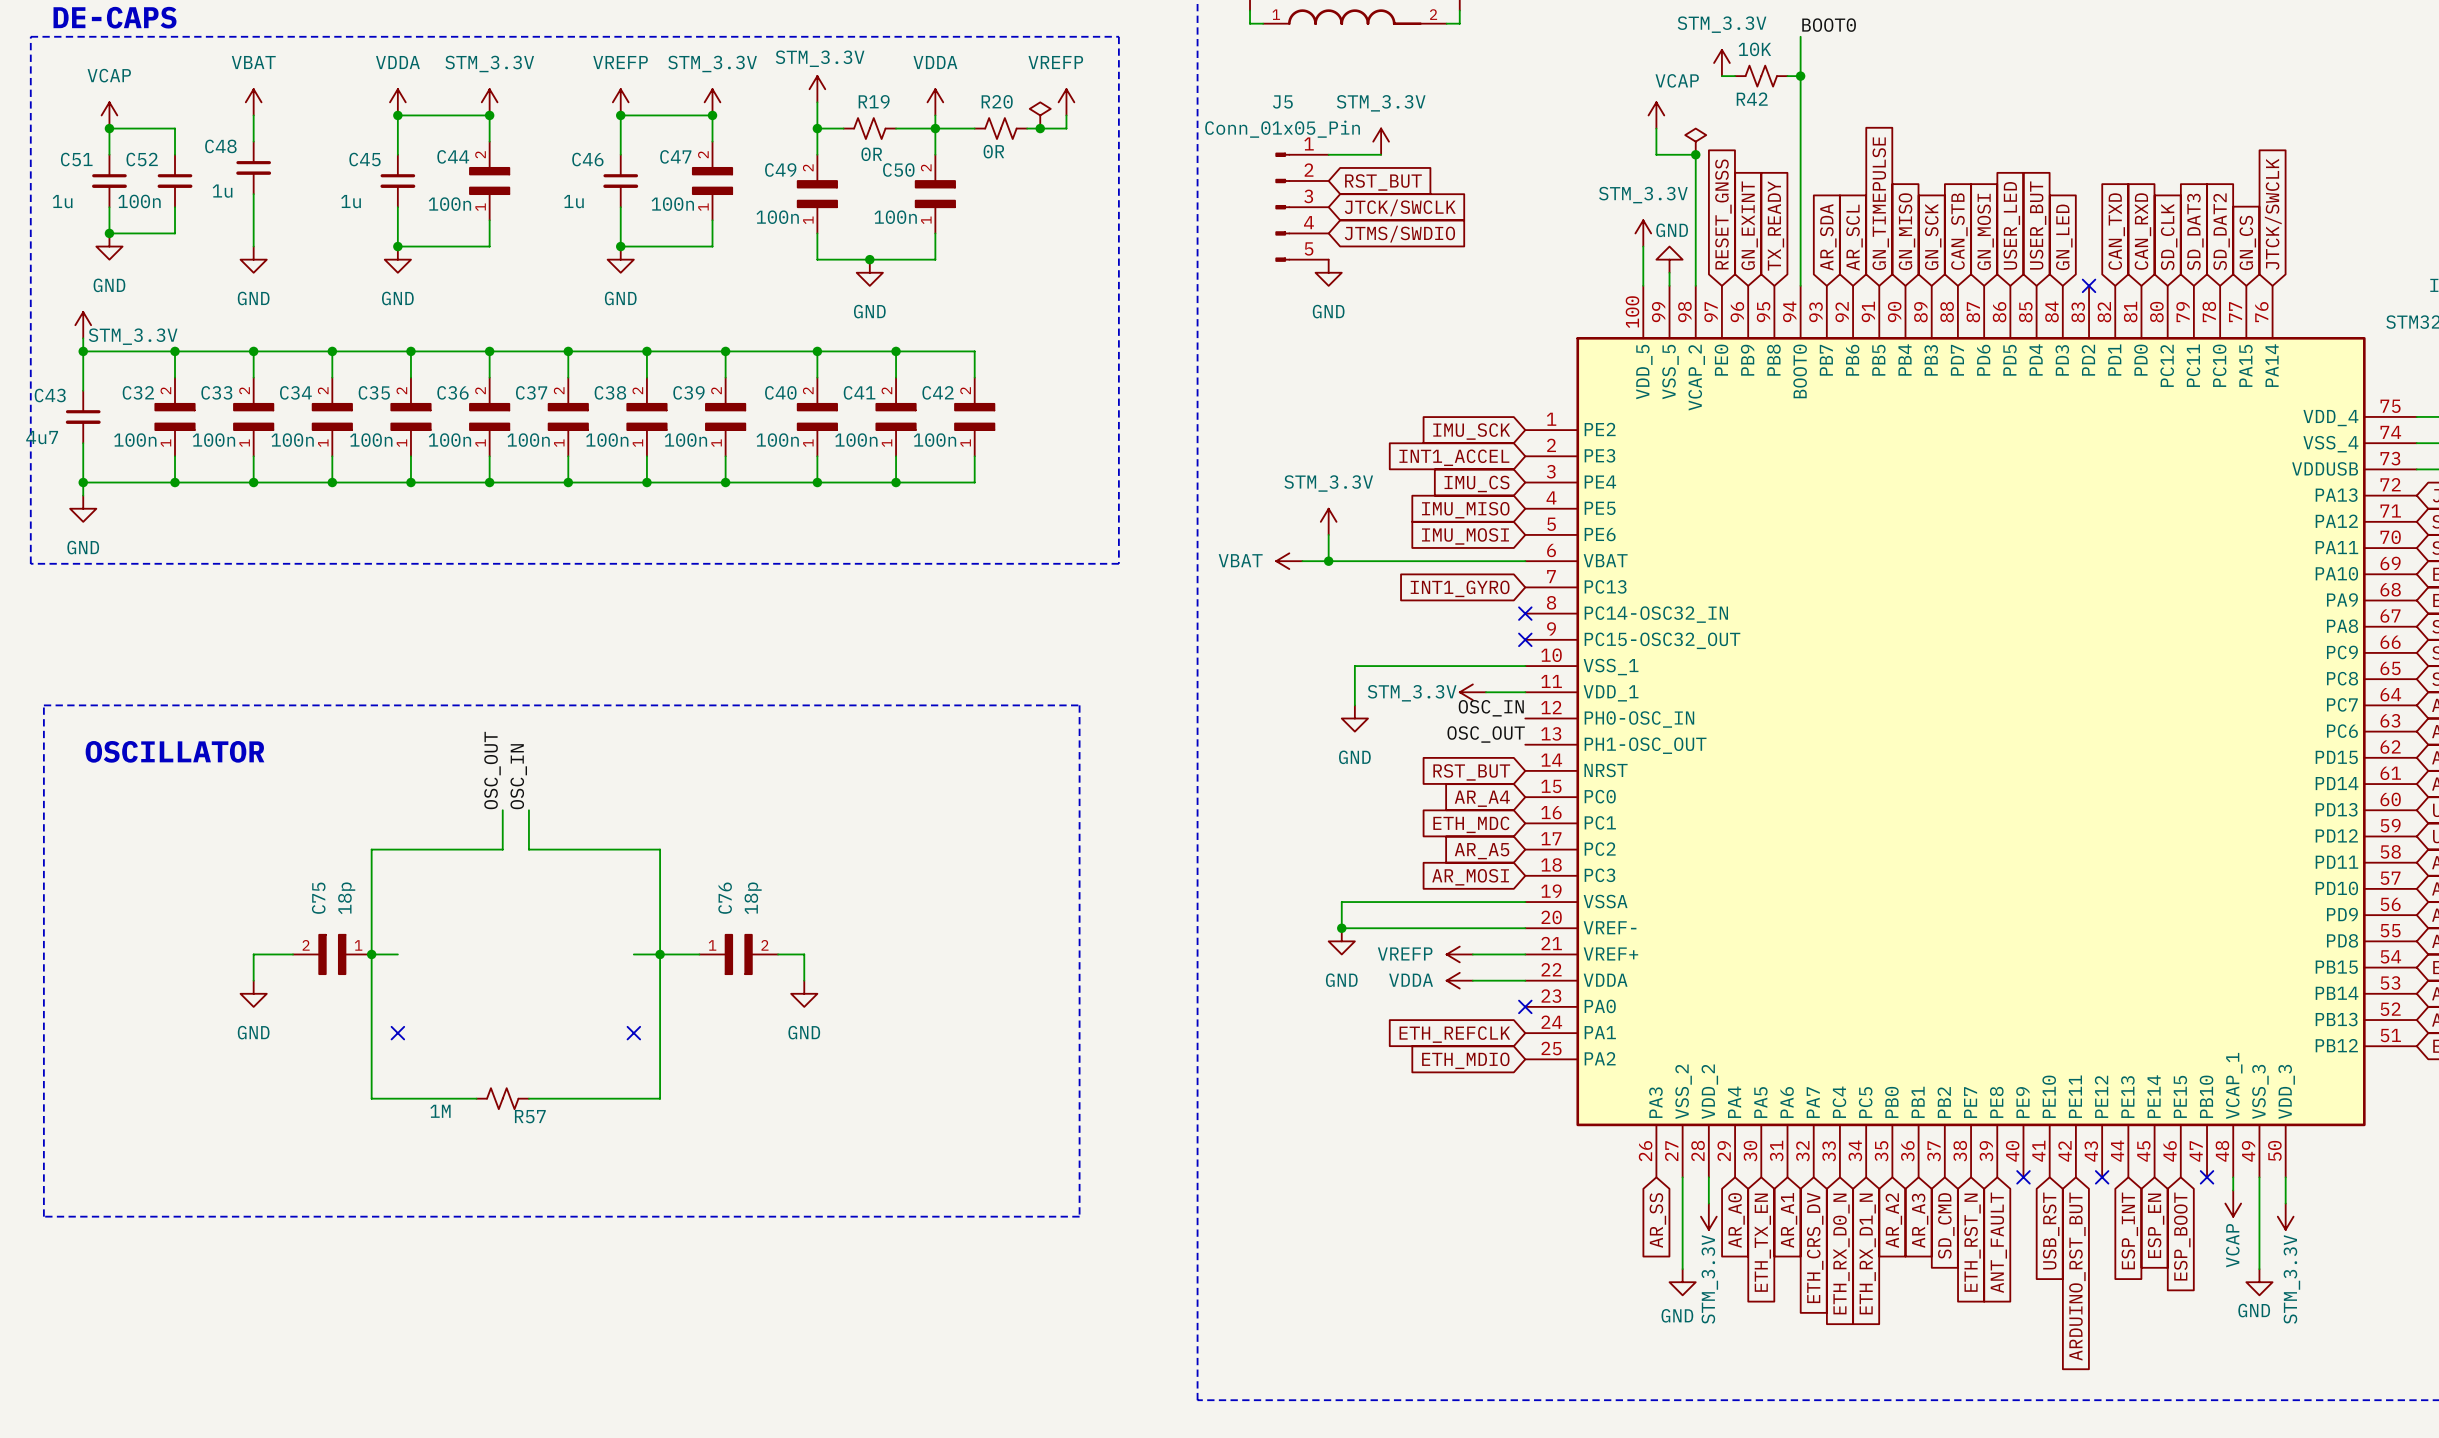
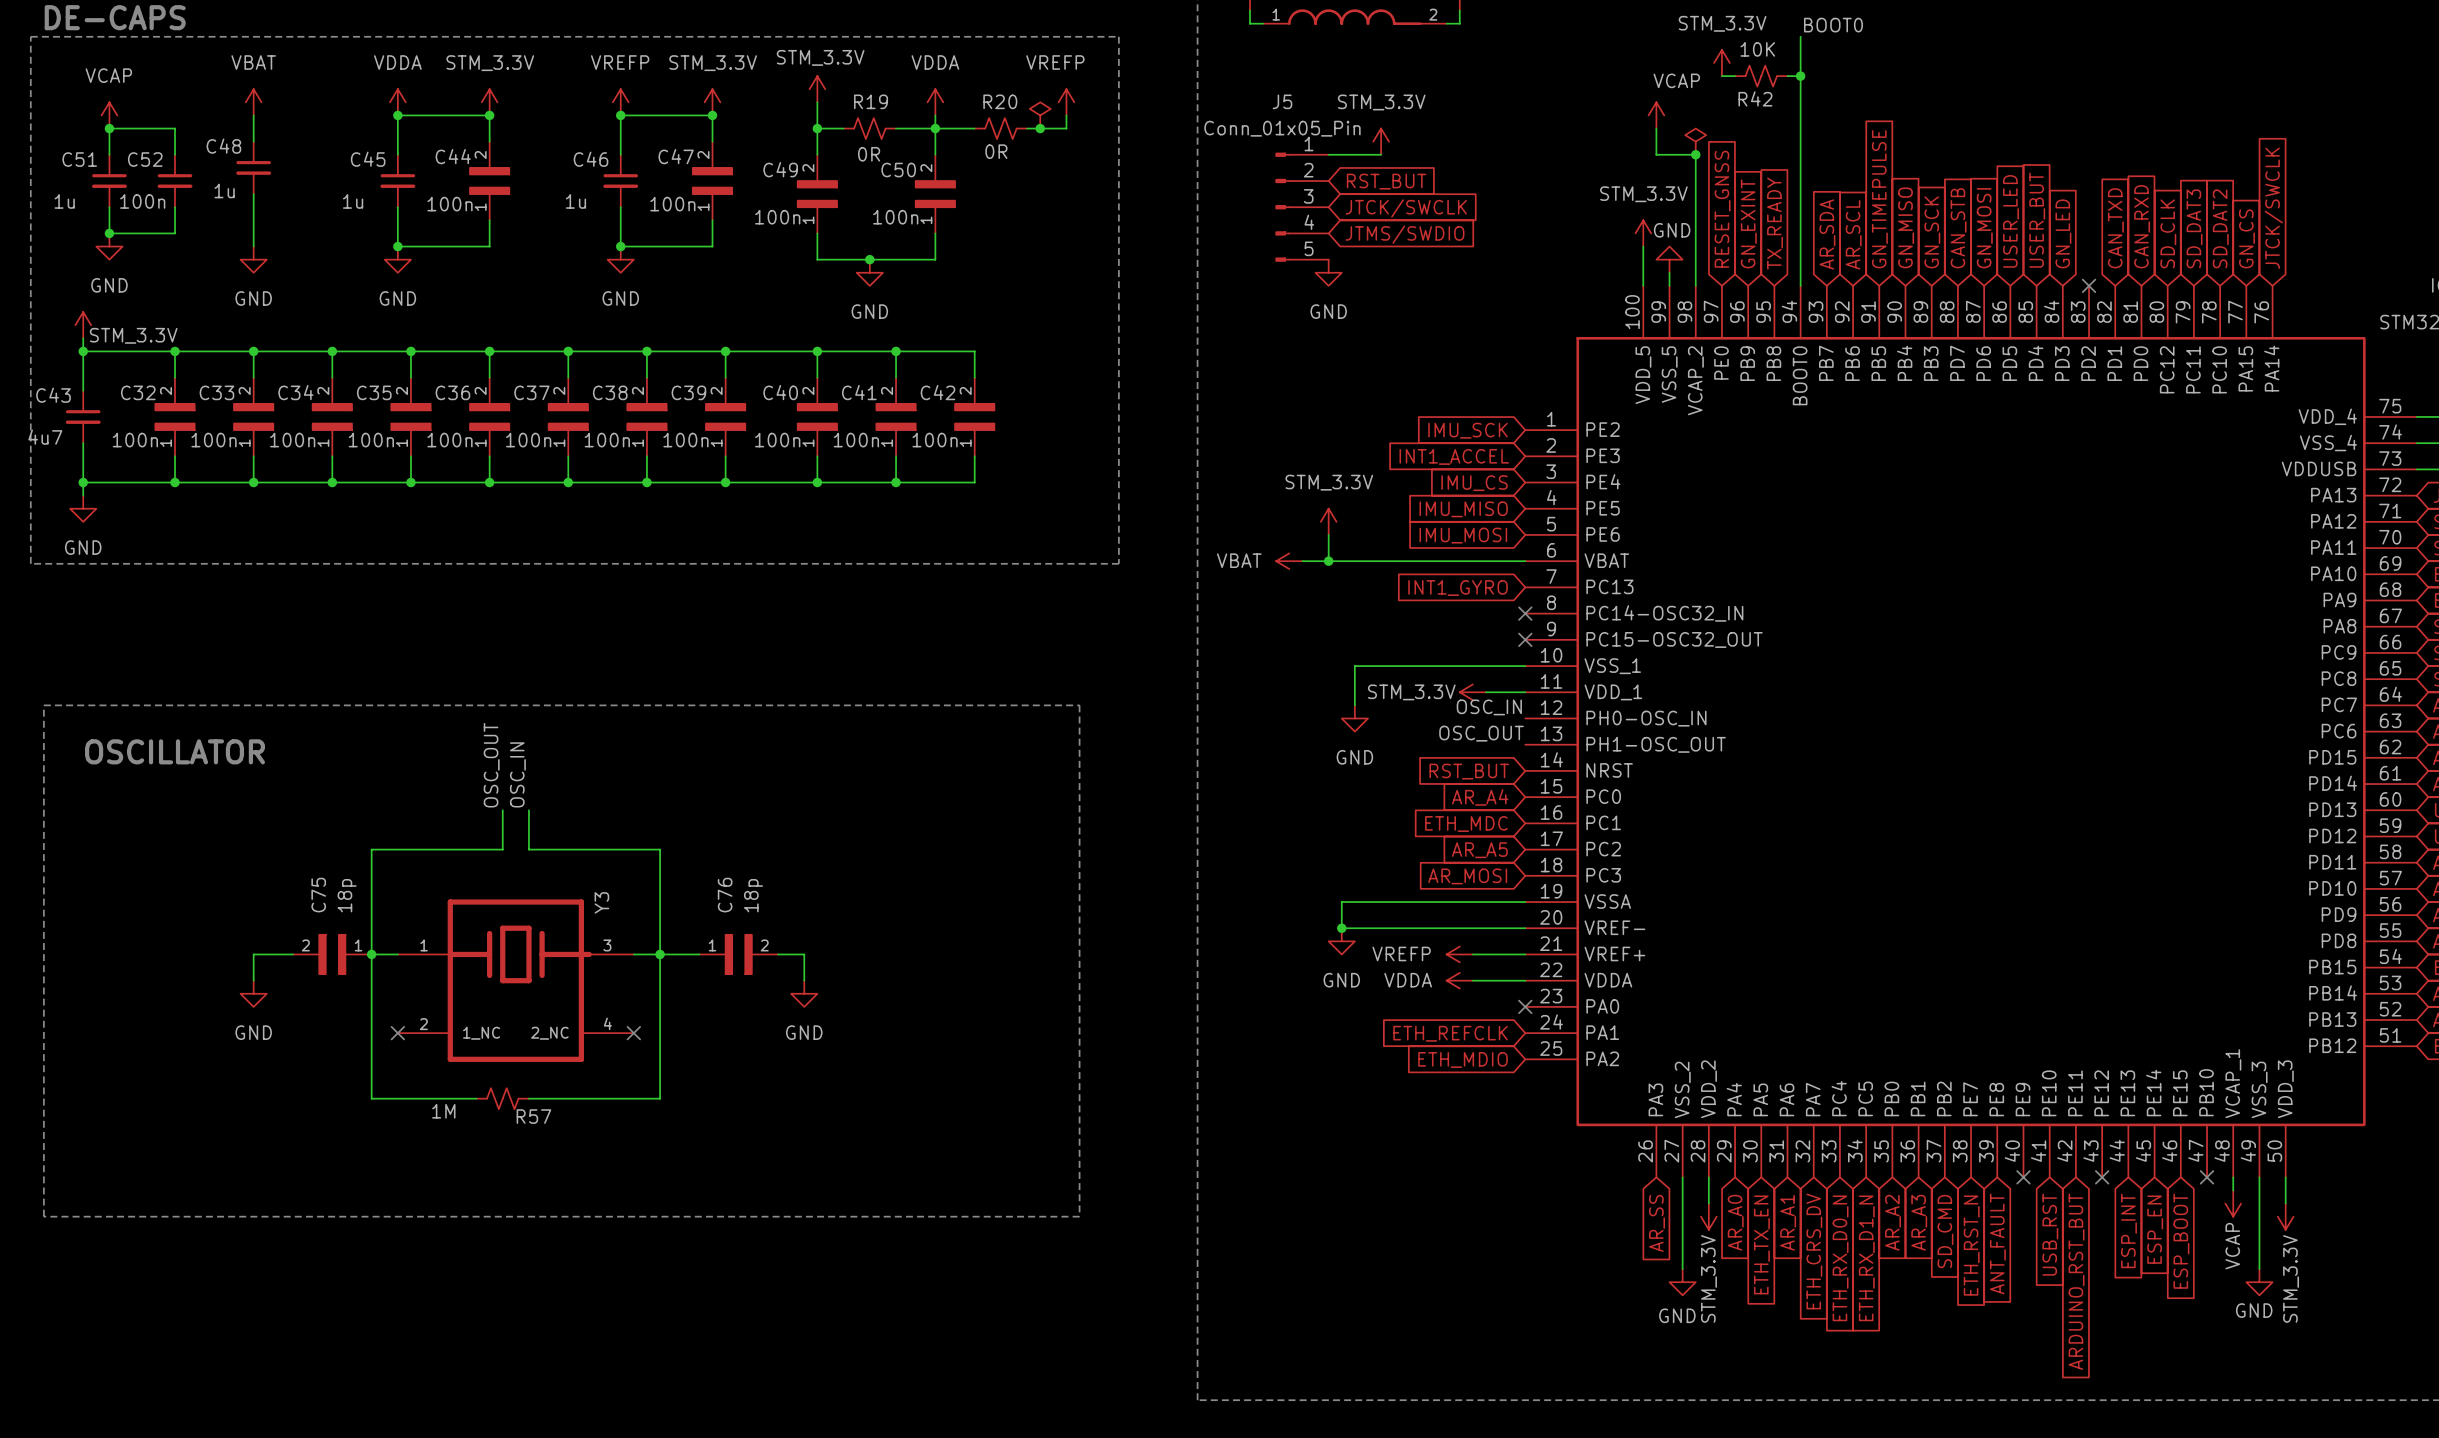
Y3: none -> (515, 980)

